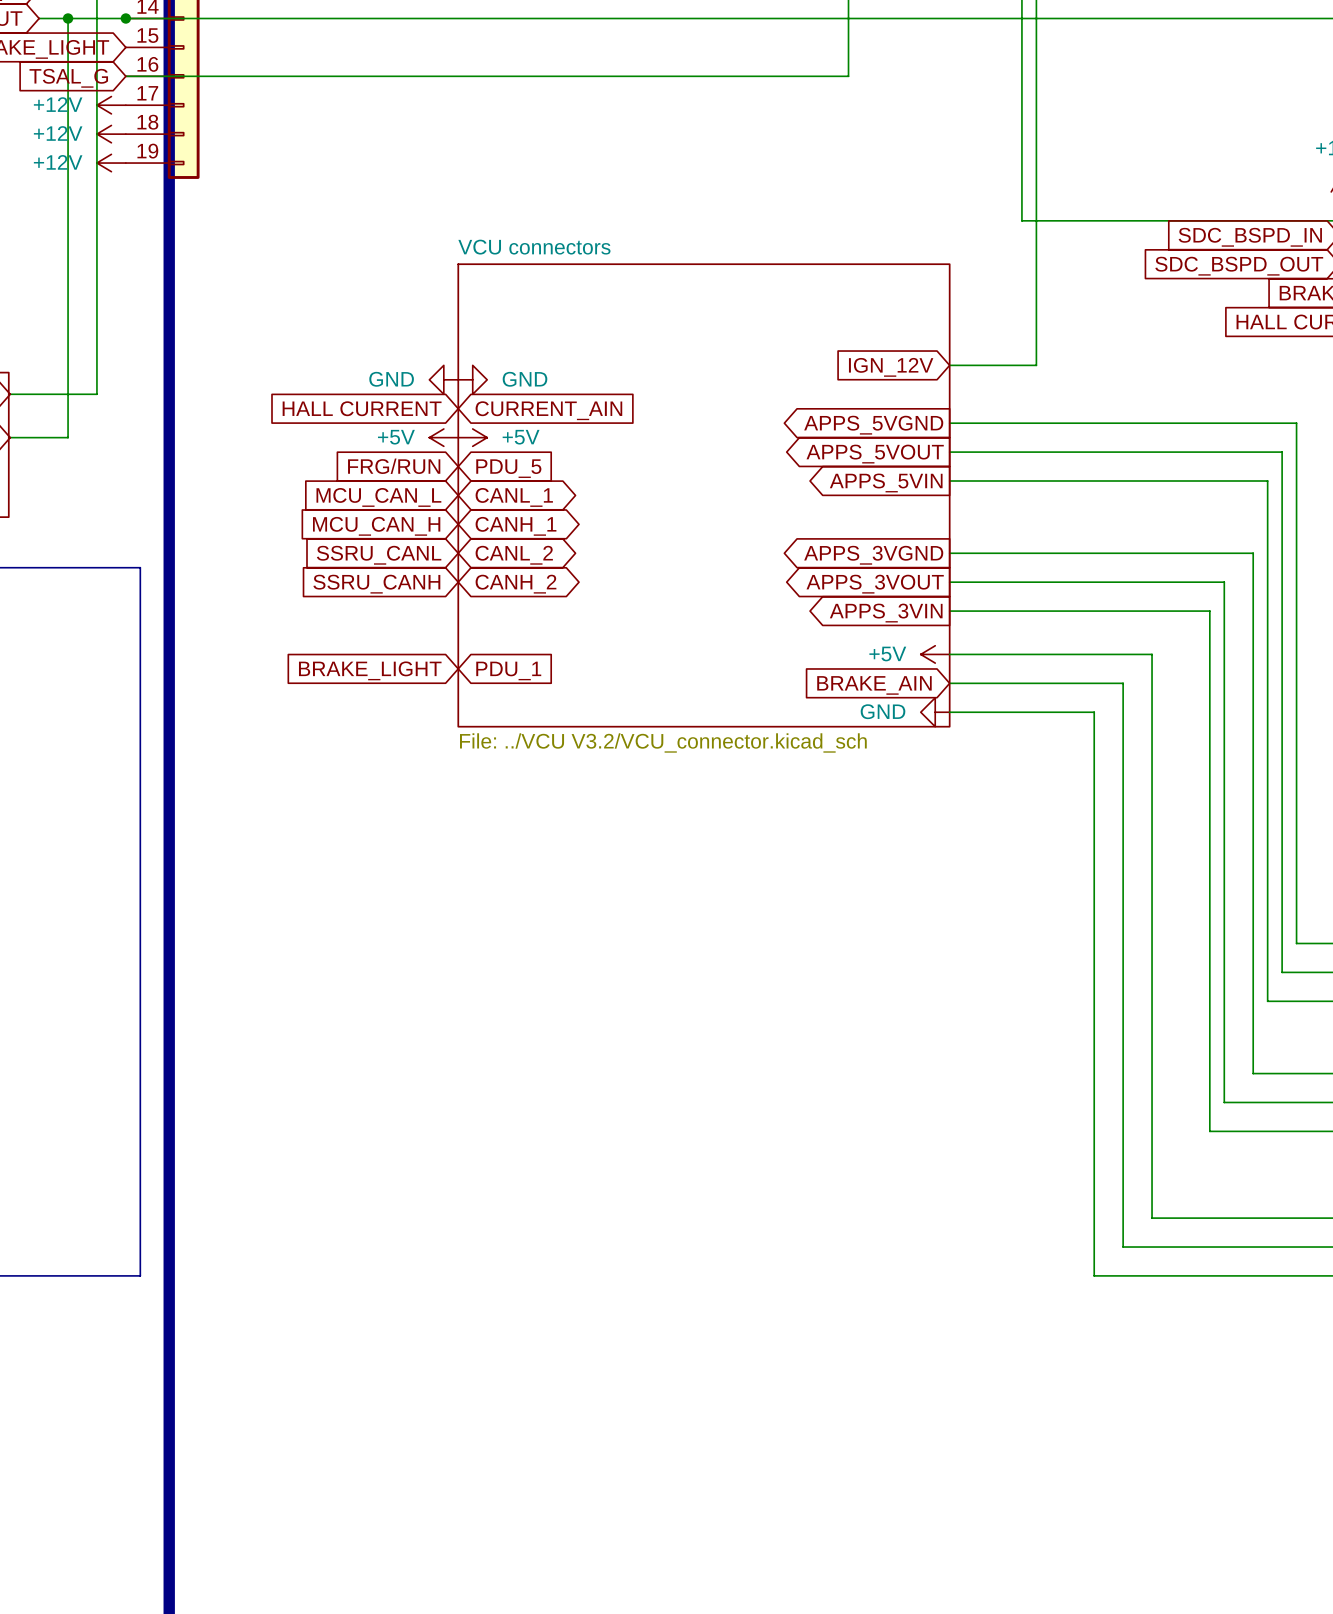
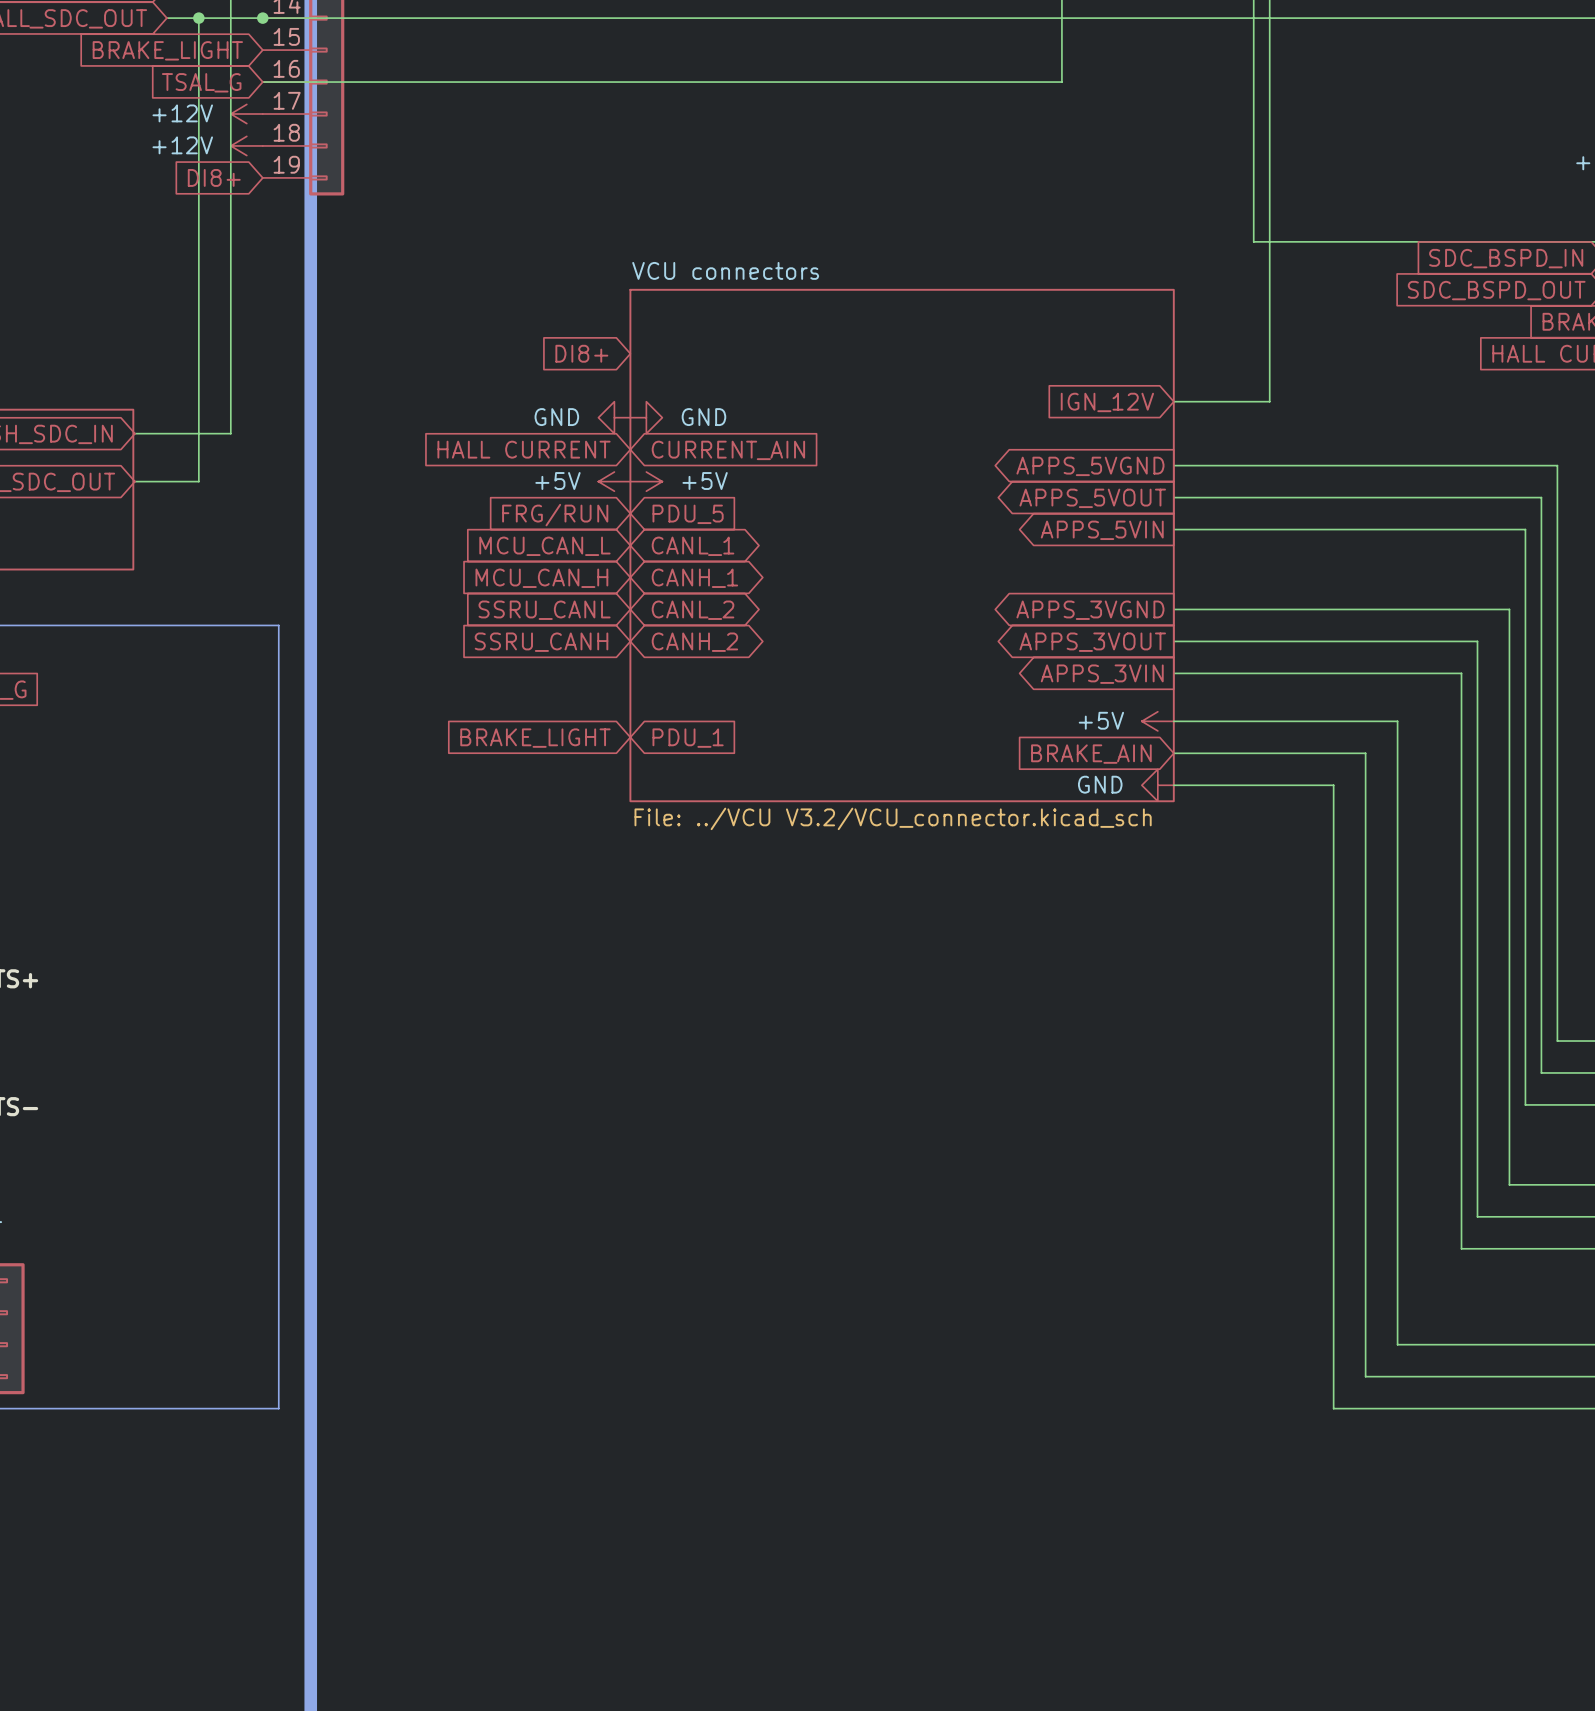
global label: none -> DI8+ (214, 177)
power symbol: +12V (111, 163) -> none
global label: none -> DI8+ (581, 353)

